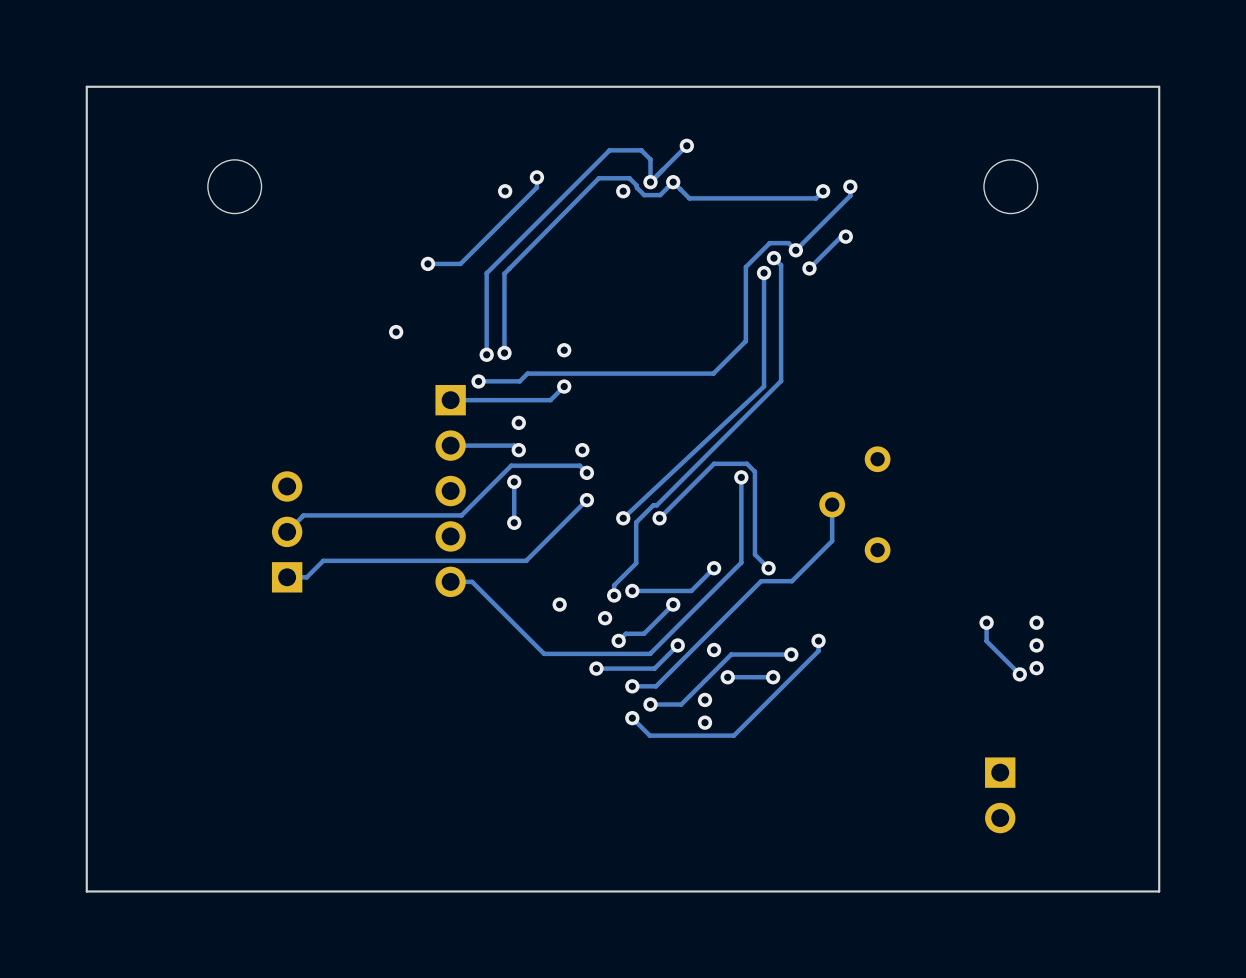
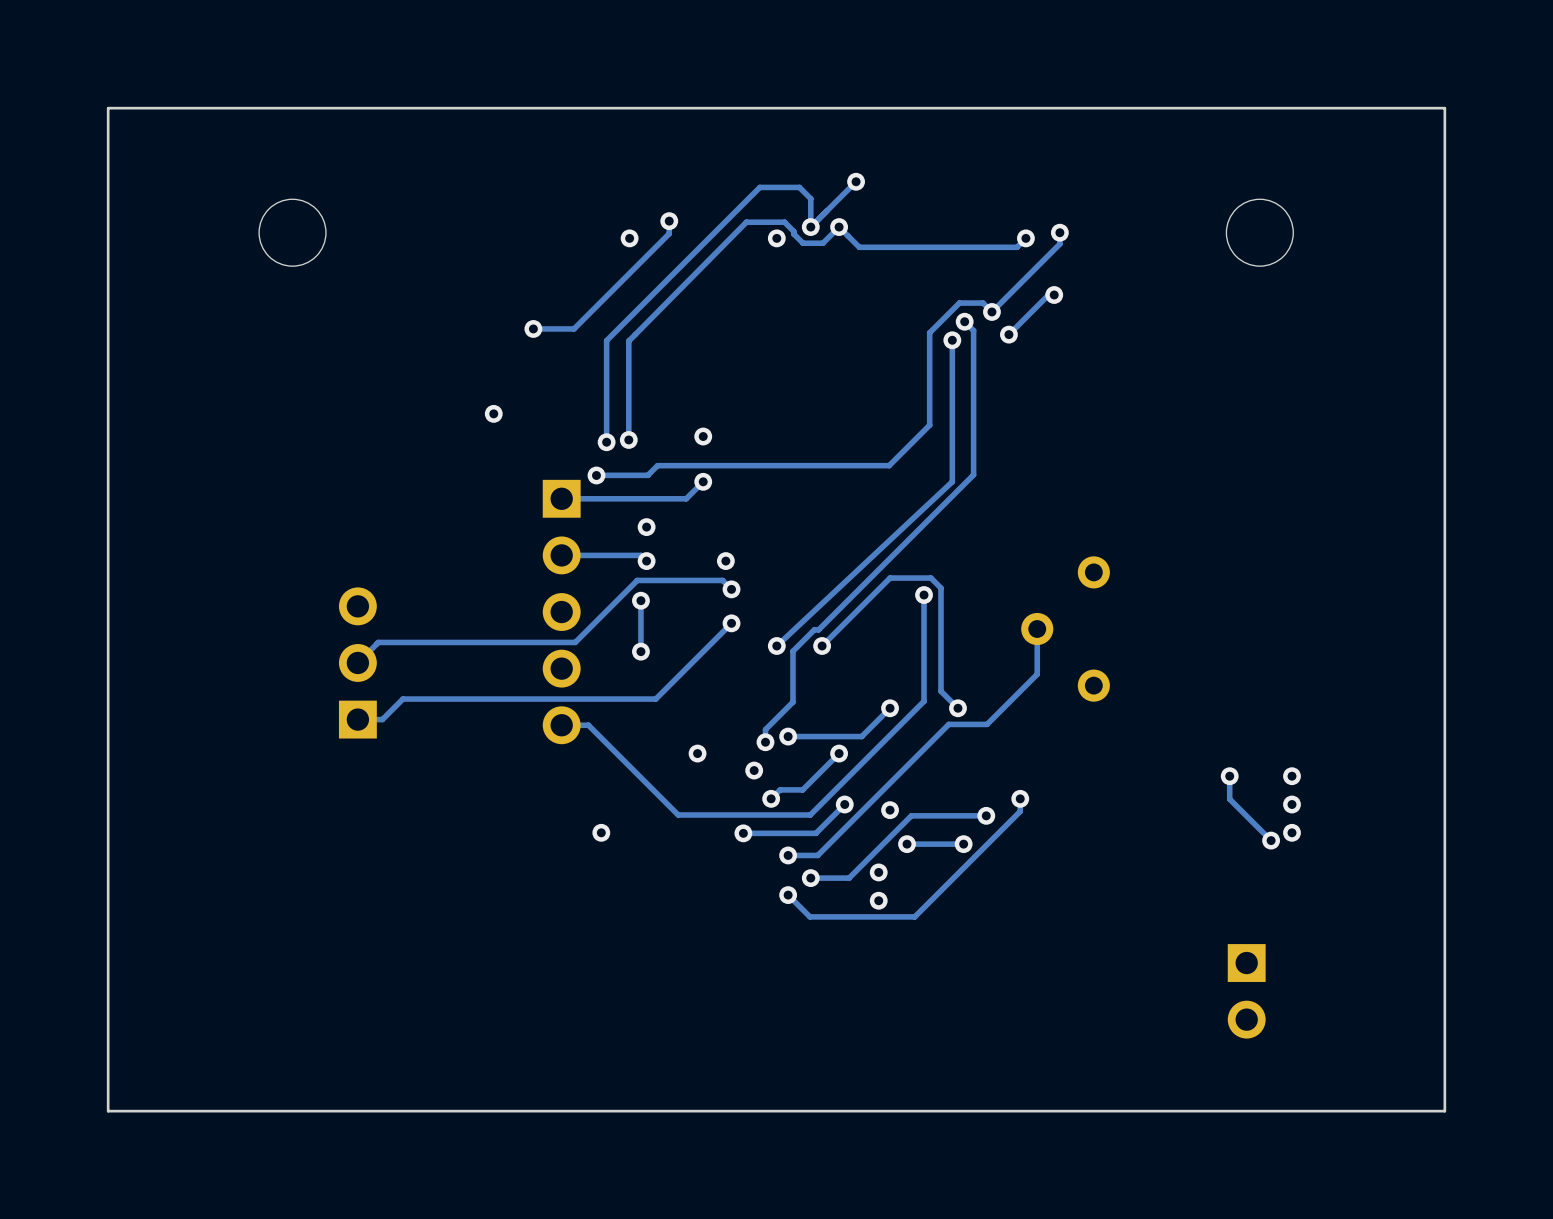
via: none -> (601, 832)

